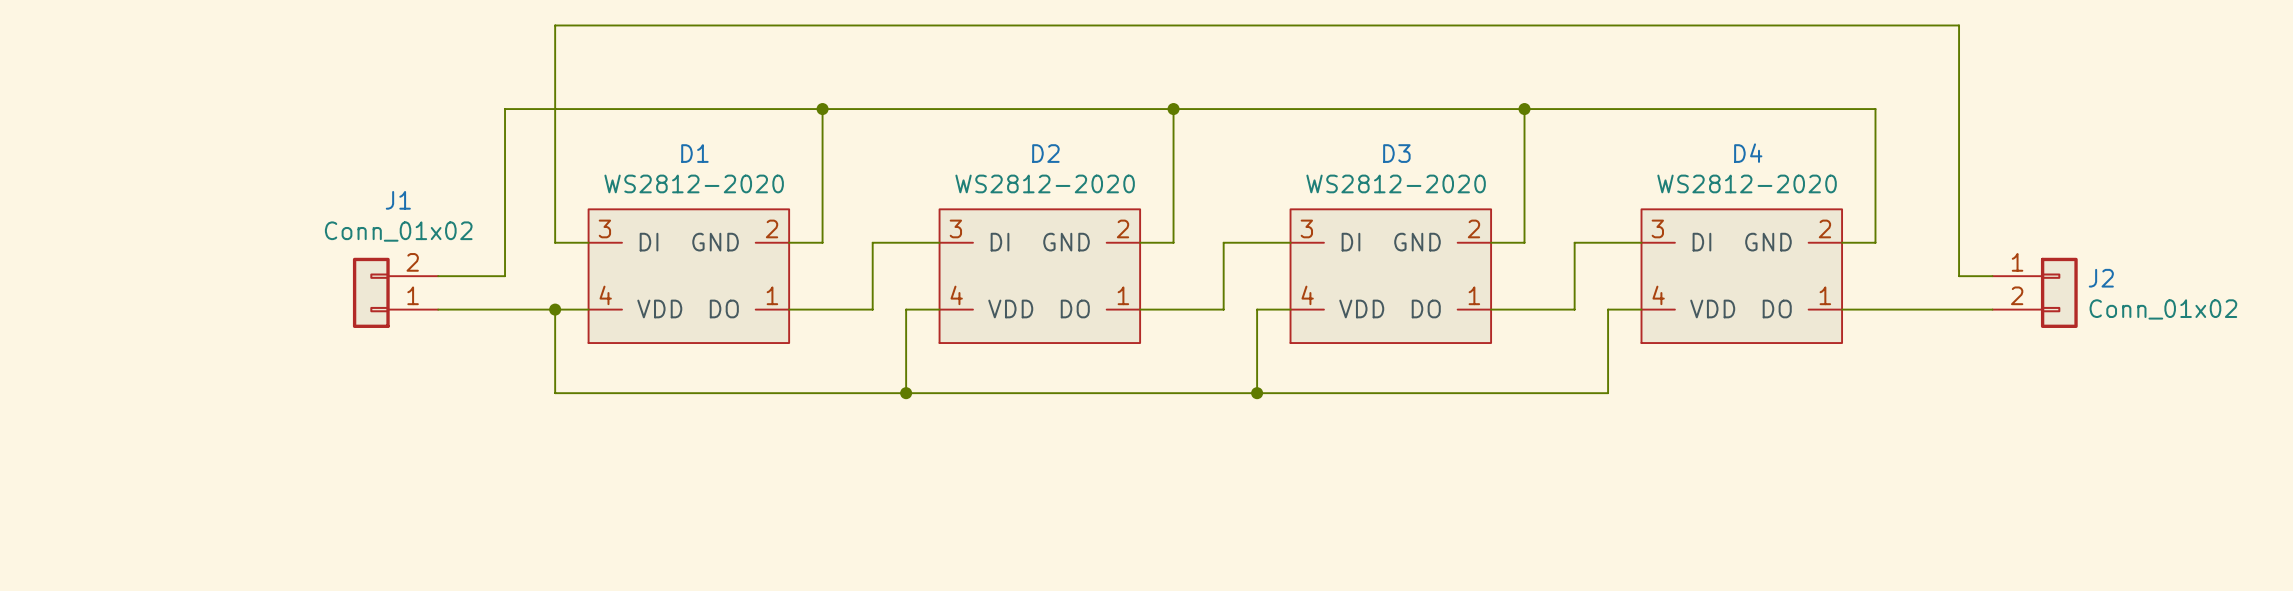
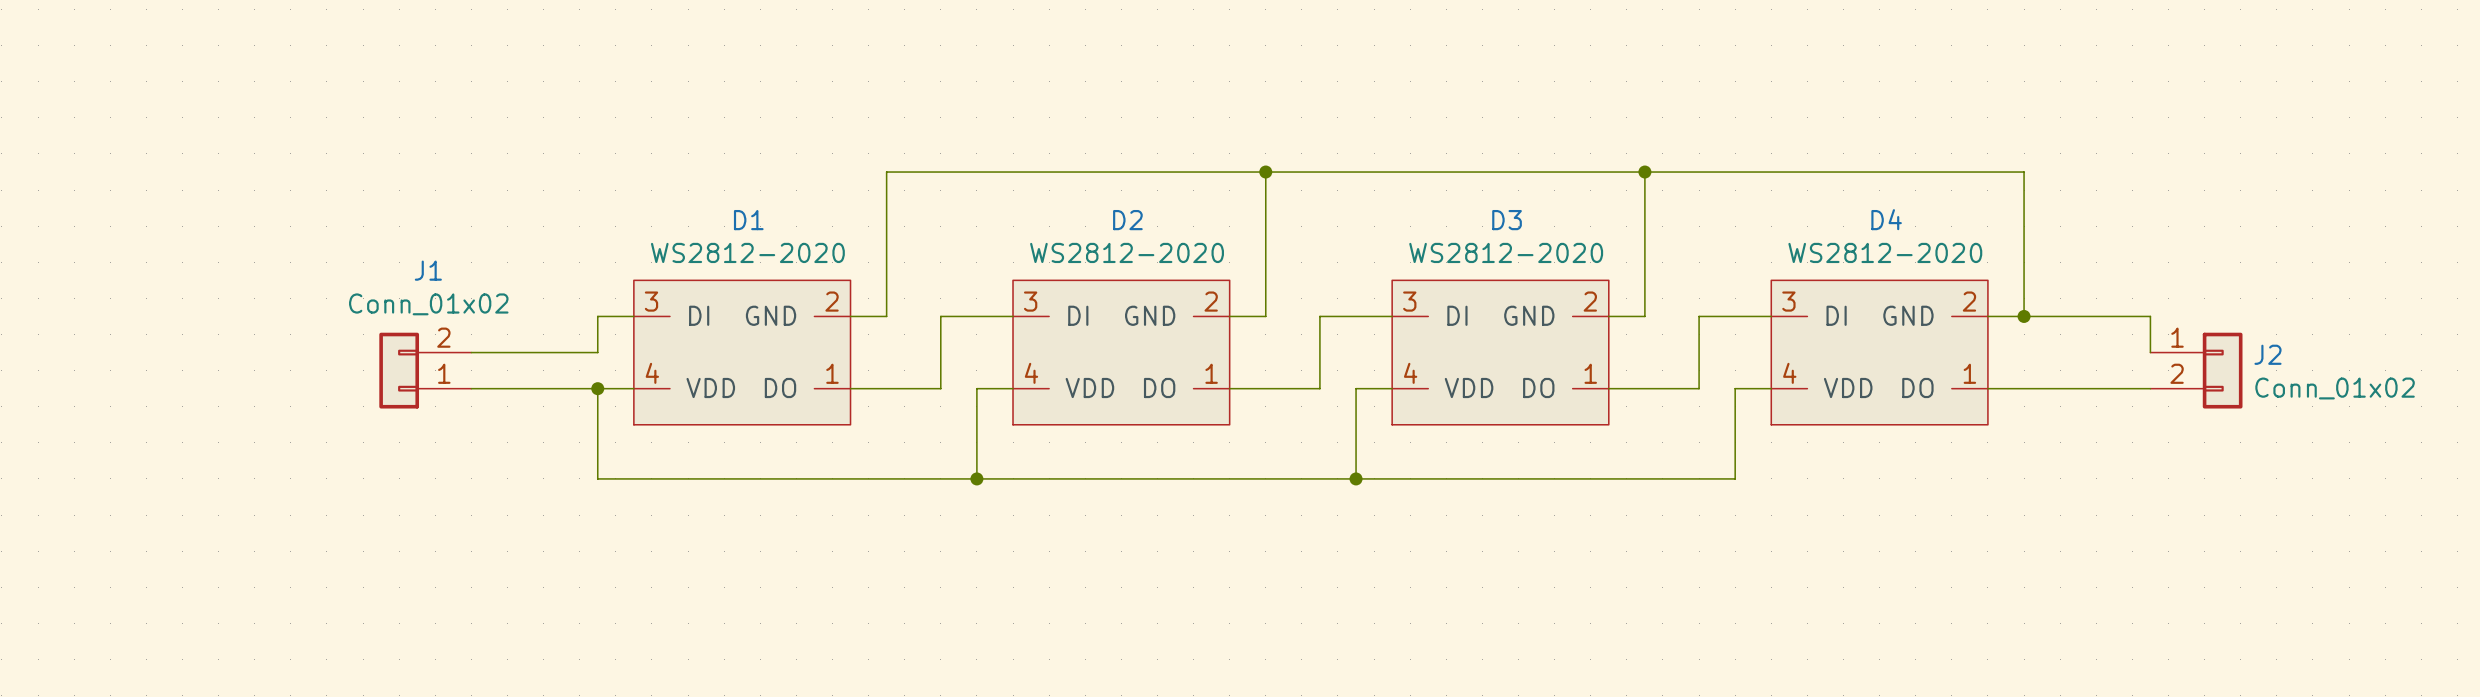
wire: (822, 109) (505, 109) (505, 276) -> (597, 316) (597, 352) (543, 352)
junction: (822, 109) -> none
wire: (555, 242) (555, 25) (1959, 25) (1959, 276) (1992, 276) -> (2024, 316) (2150, 316) (2150, 352)
junction: none -> (2024, 316)

